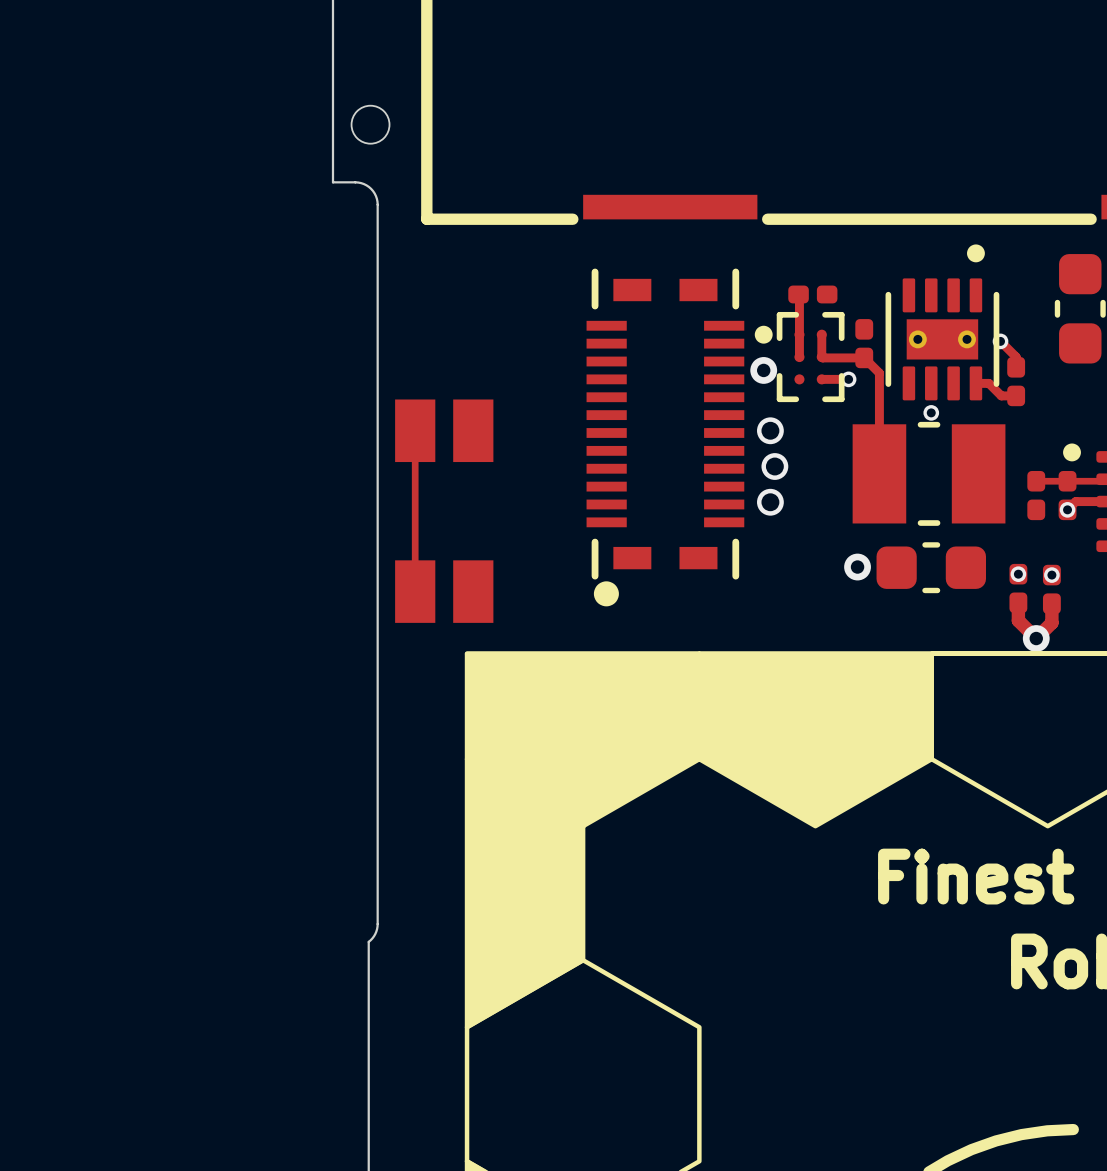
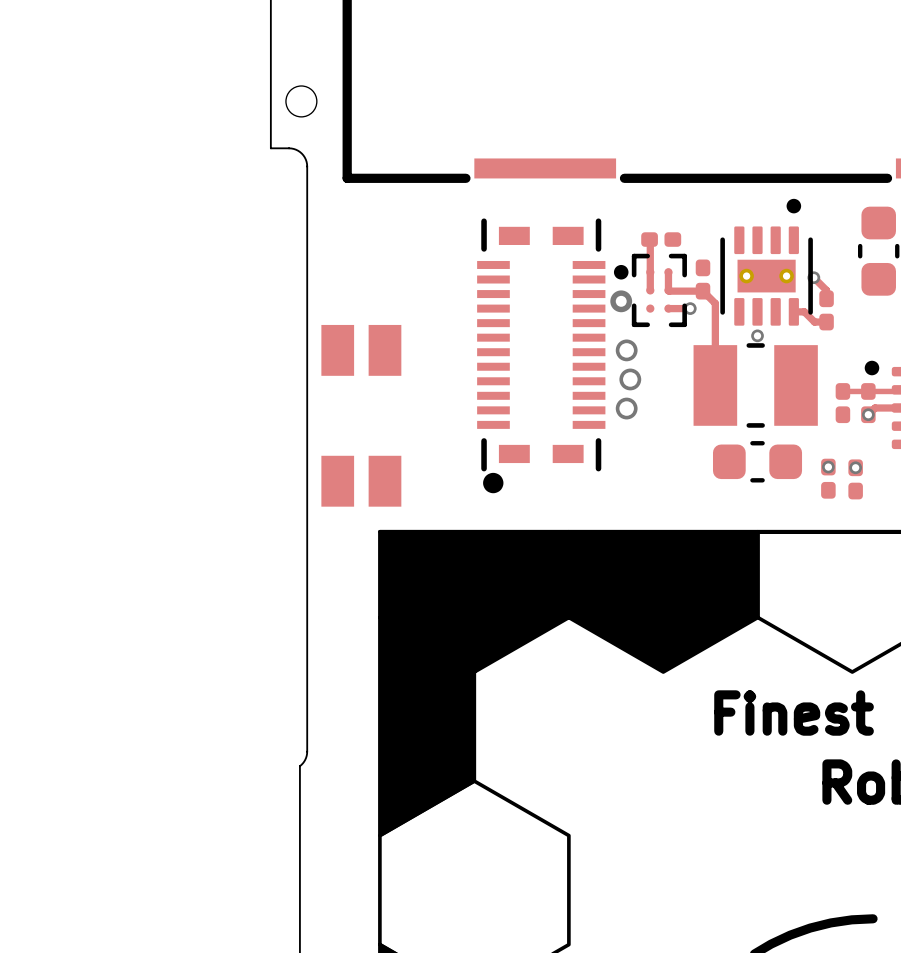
track: (415, 430) (415, 591) -> none
via: (857, 567) -> none
track: (1018, 602) (1018, 620) (1036, 638) (1051, 622) (1051, 603) -> none
via: (1036, 638) -> none

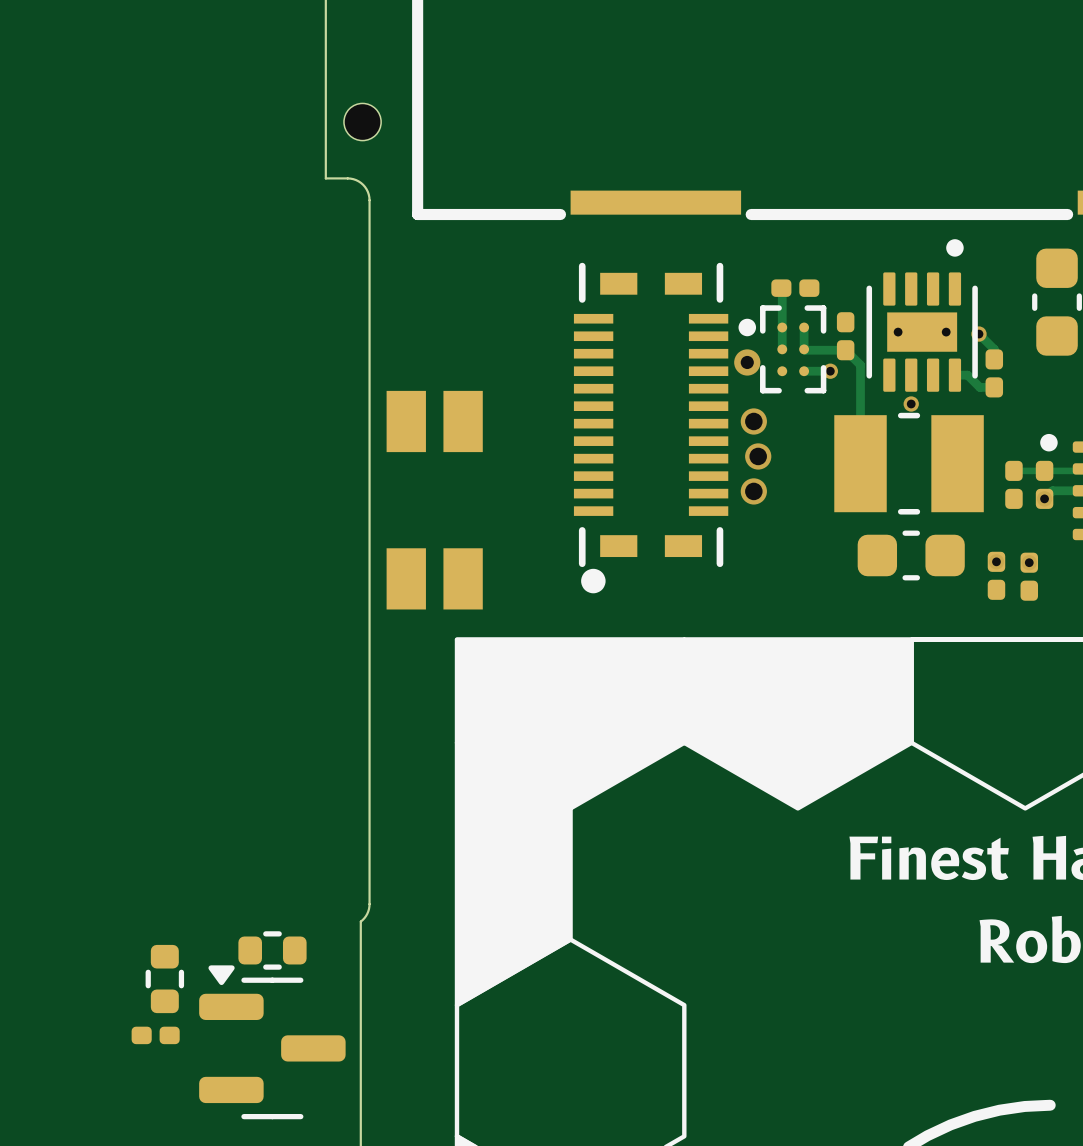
part: none -> (272, 950)
part: none -> (164, 979)
part: none -> (155, 1035)
part: none -> (272, 1042)

